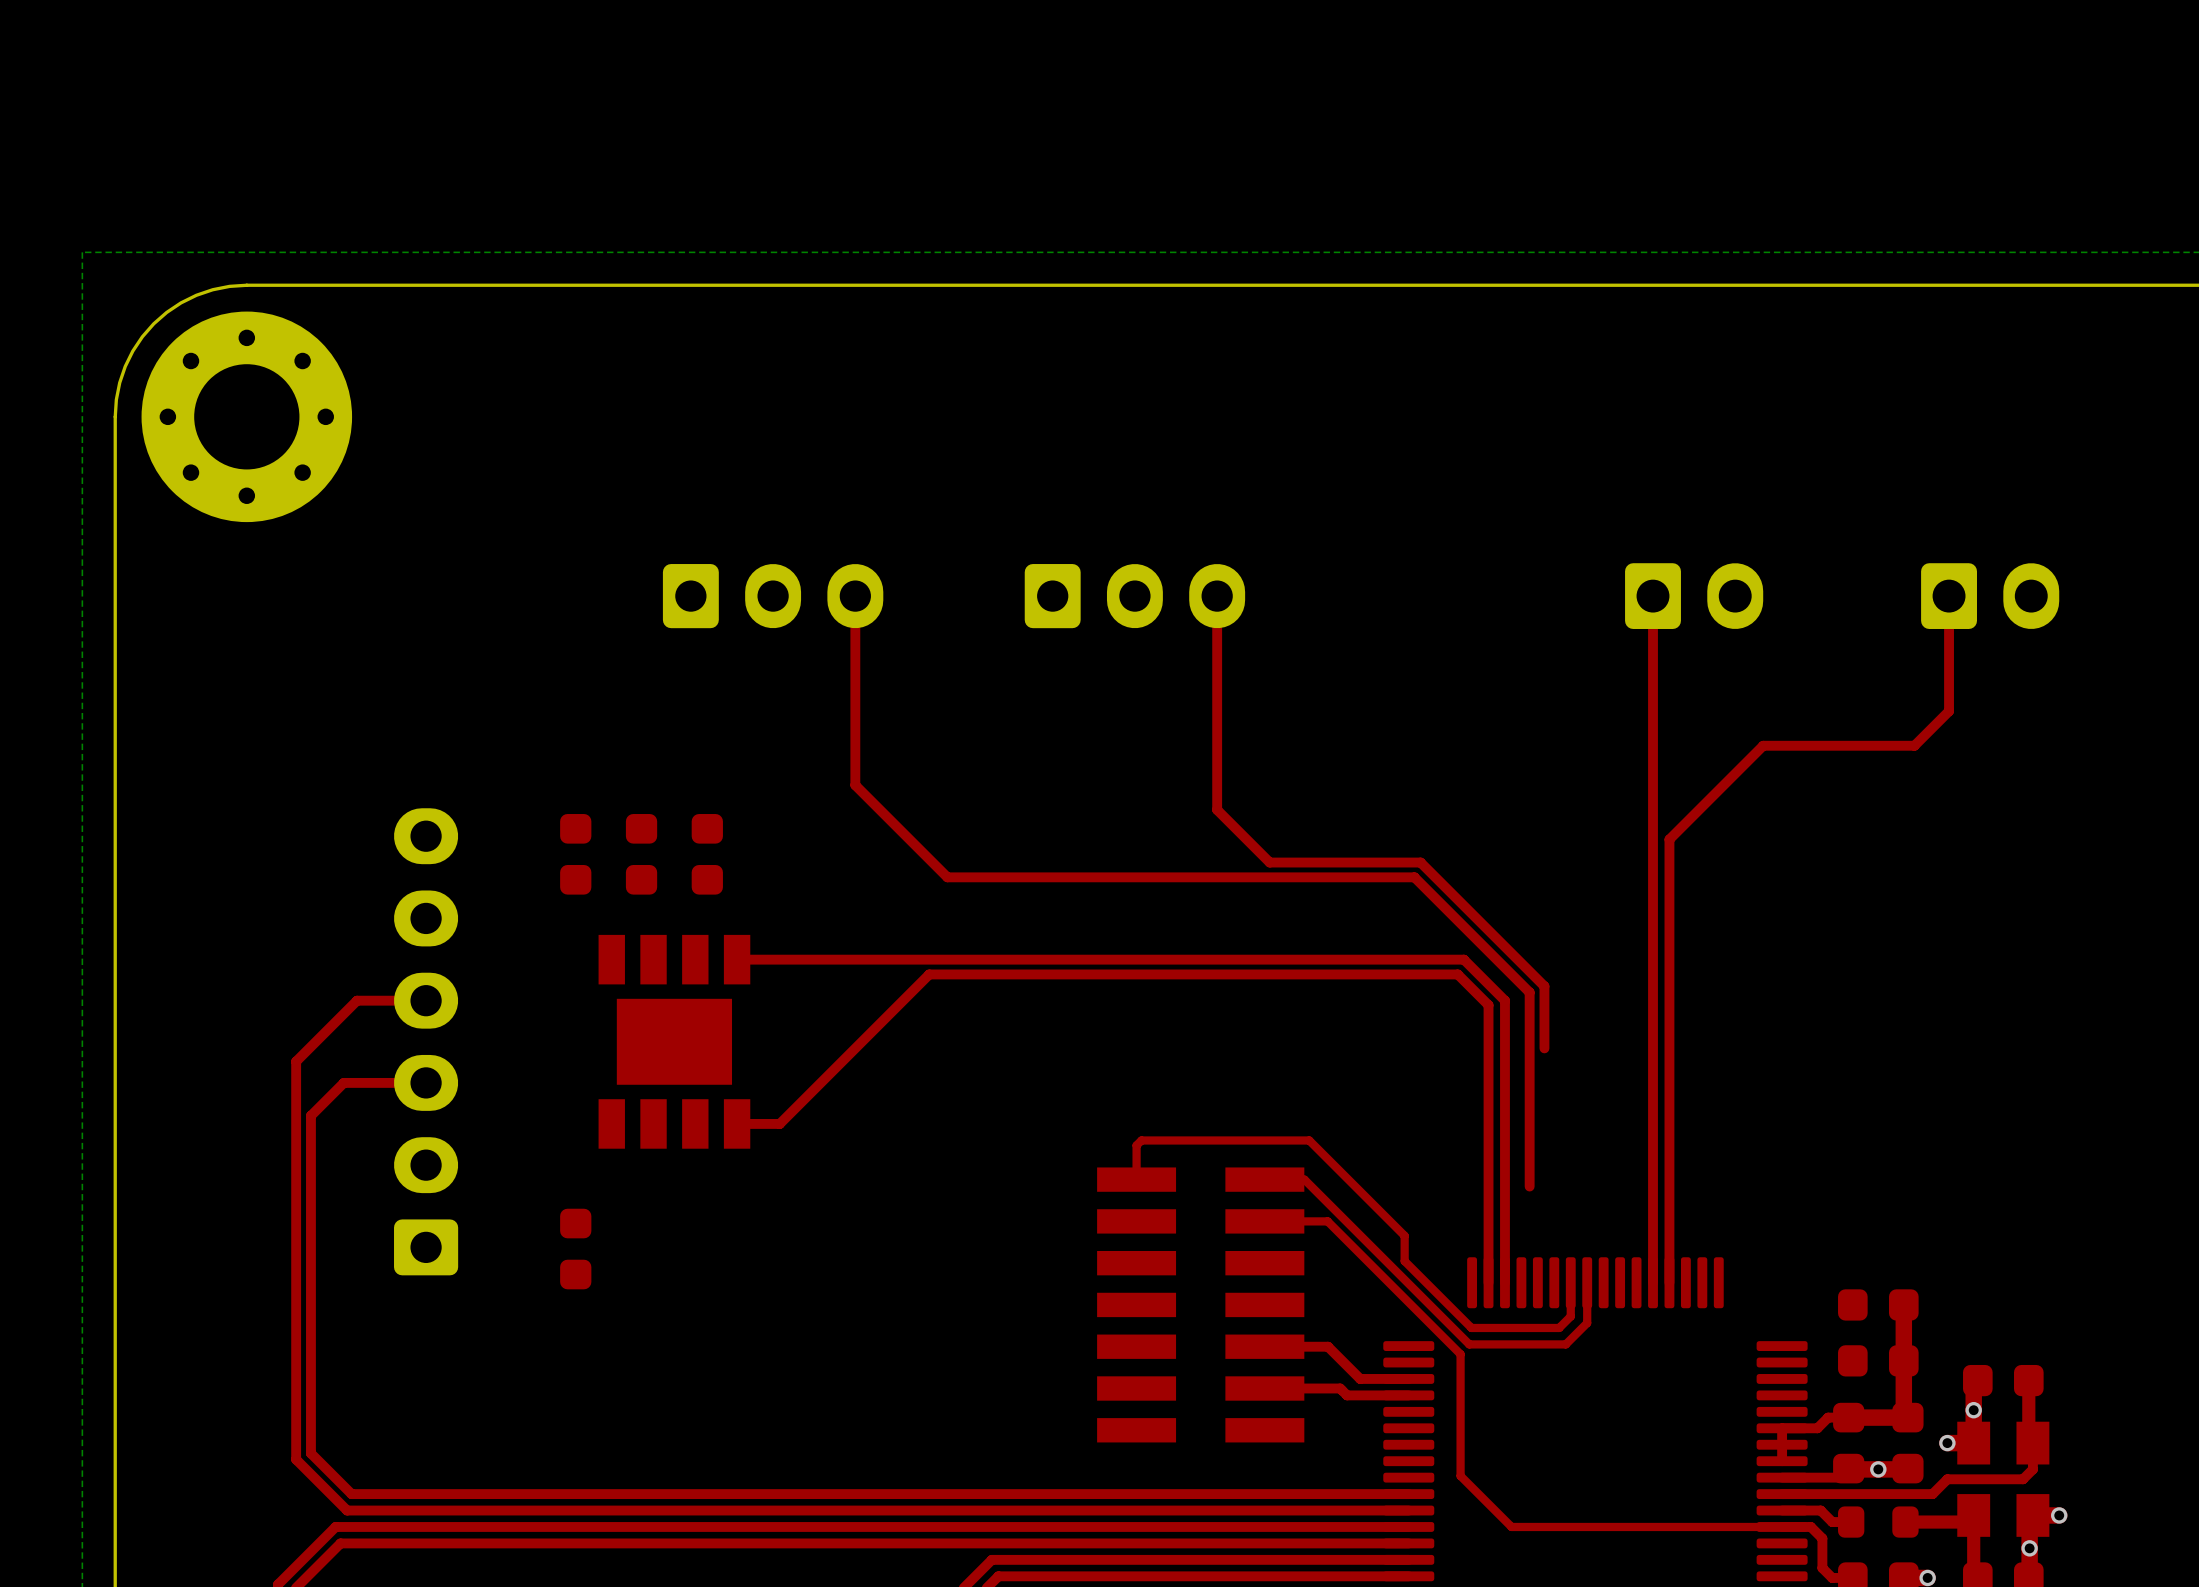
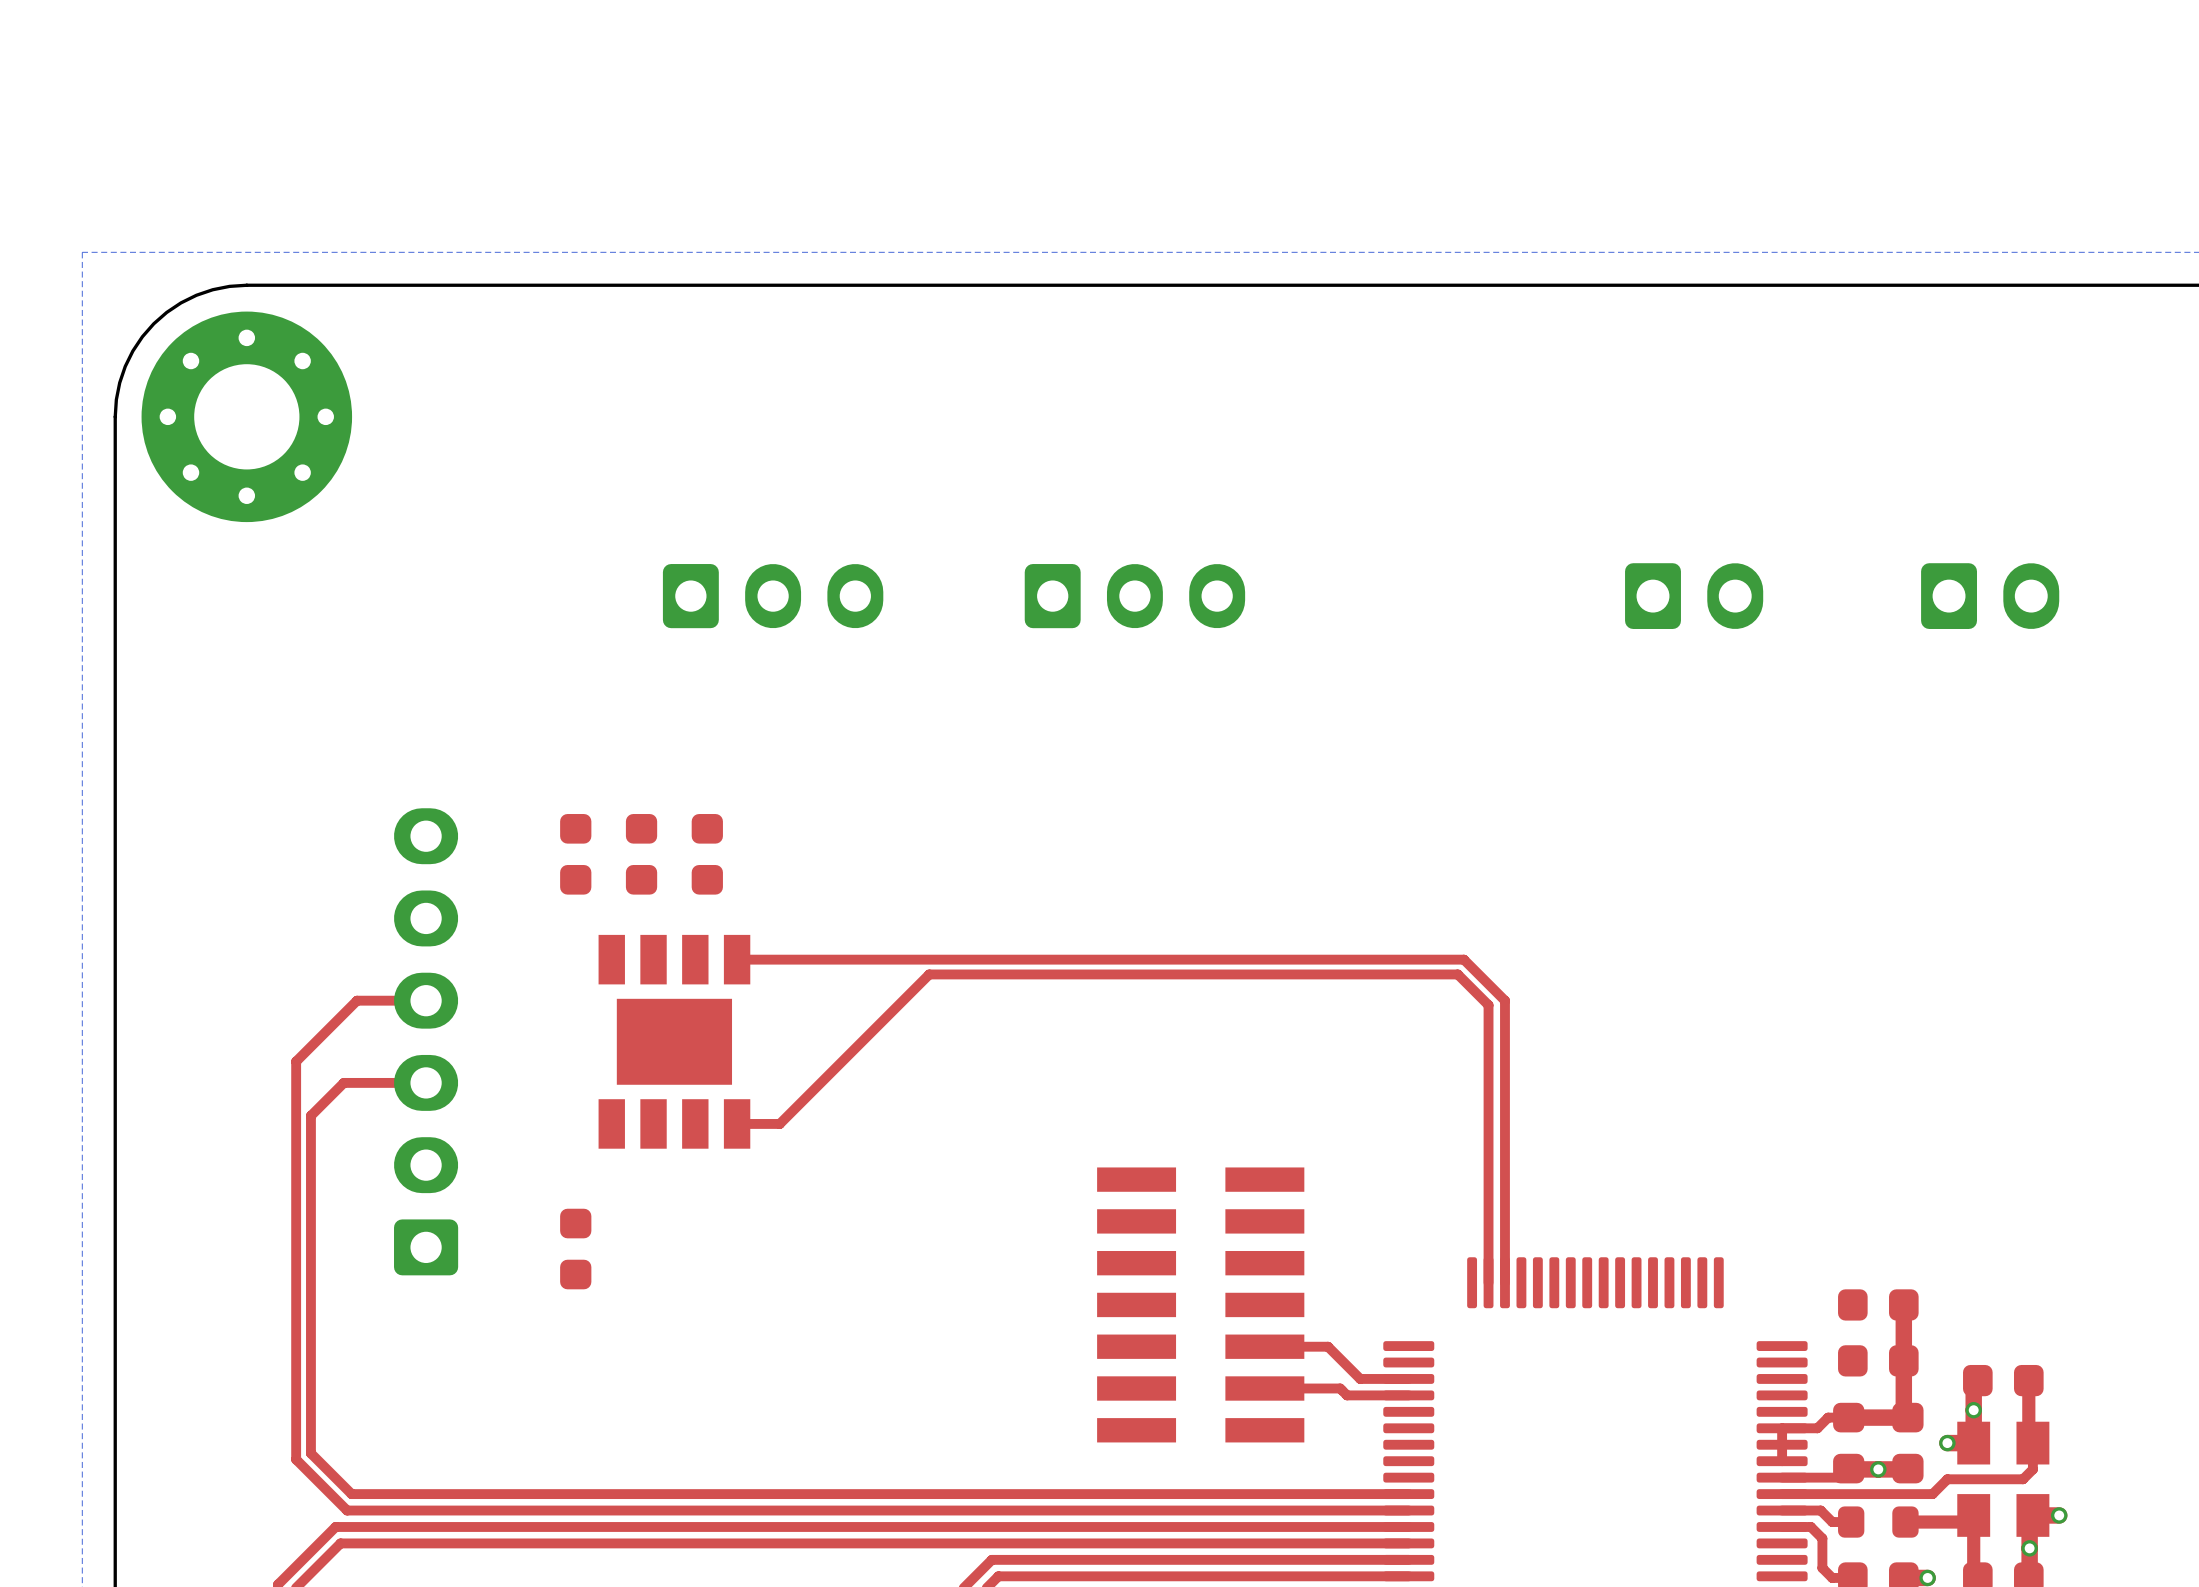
top track: (855, 596) (855, 785) (947, 877) (1414, 877) (1529, 992) (1529, 1186) -> none
top track: (1217, 596) (1217, 809) (1269, 862) (1420, 862) (1544, 986) (1544, 1048) -> none
top track: (1653, 596) (1653, 1282) -> none
top track: (1949, 596) (1949, 711) (1914, 745) (1763, 745) (1669, 839) (1669, 1282) -> none
top track: (1136, 1179) (1136, 1145) (1141, 1140) (1309, 1140) (1404, 1235) (1404, 1261) (1471, 1327) (1559, 1327) (1570, 1316) (1570, 1282) -> none
top track: (1264, 1179) (1304, 1179) (1469, 1344) (1565, 1344) (1587, 1323) (1587, 1282) -> none
top track: (1264, 1221) (1327, 1221) (1460, 1354) (1460, 1475) (1511, 1526) (1782, 1526) -> none

